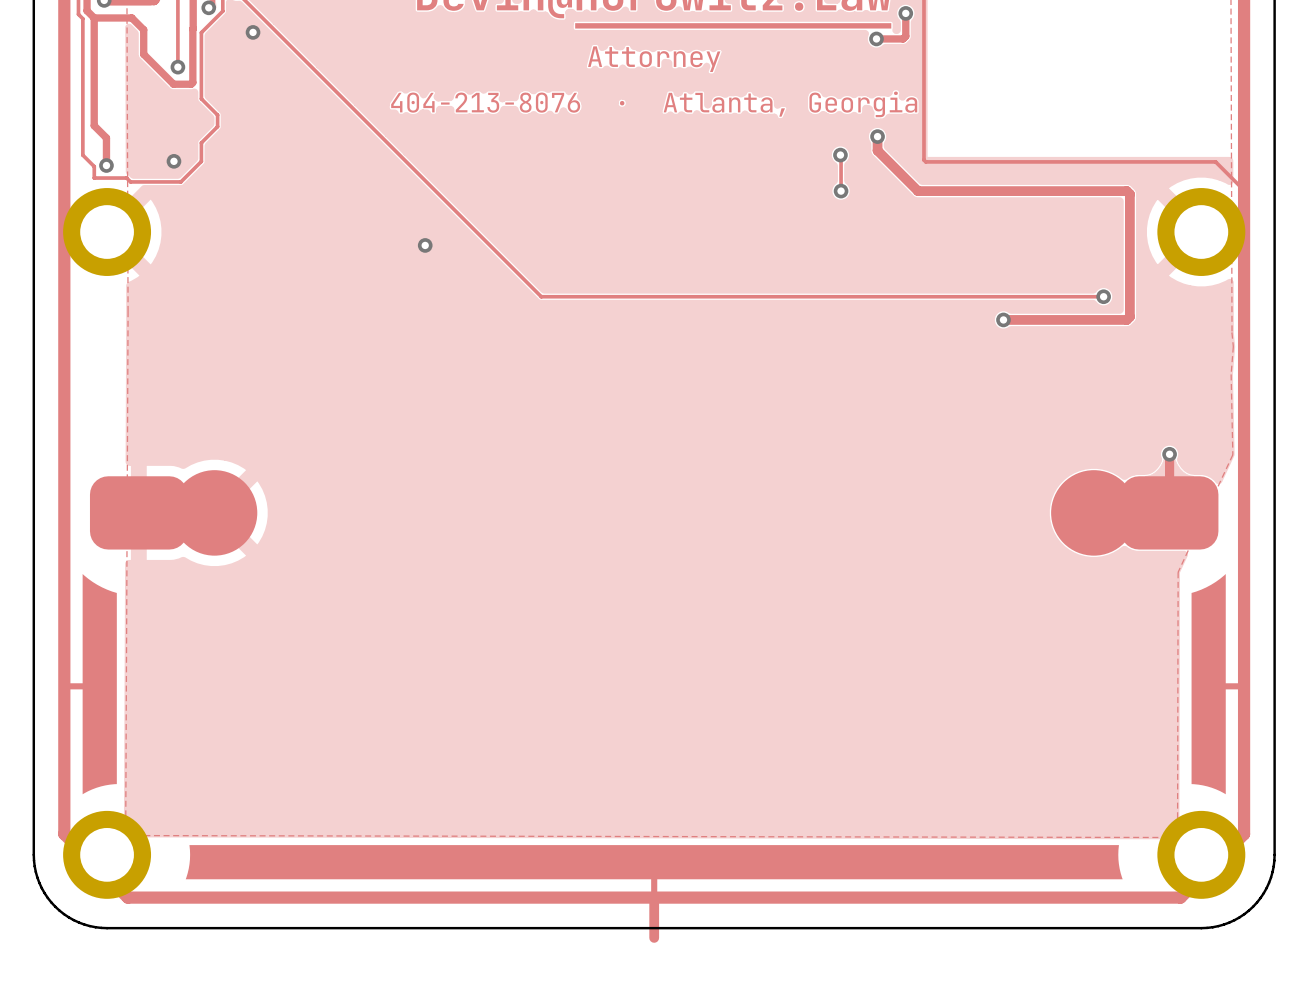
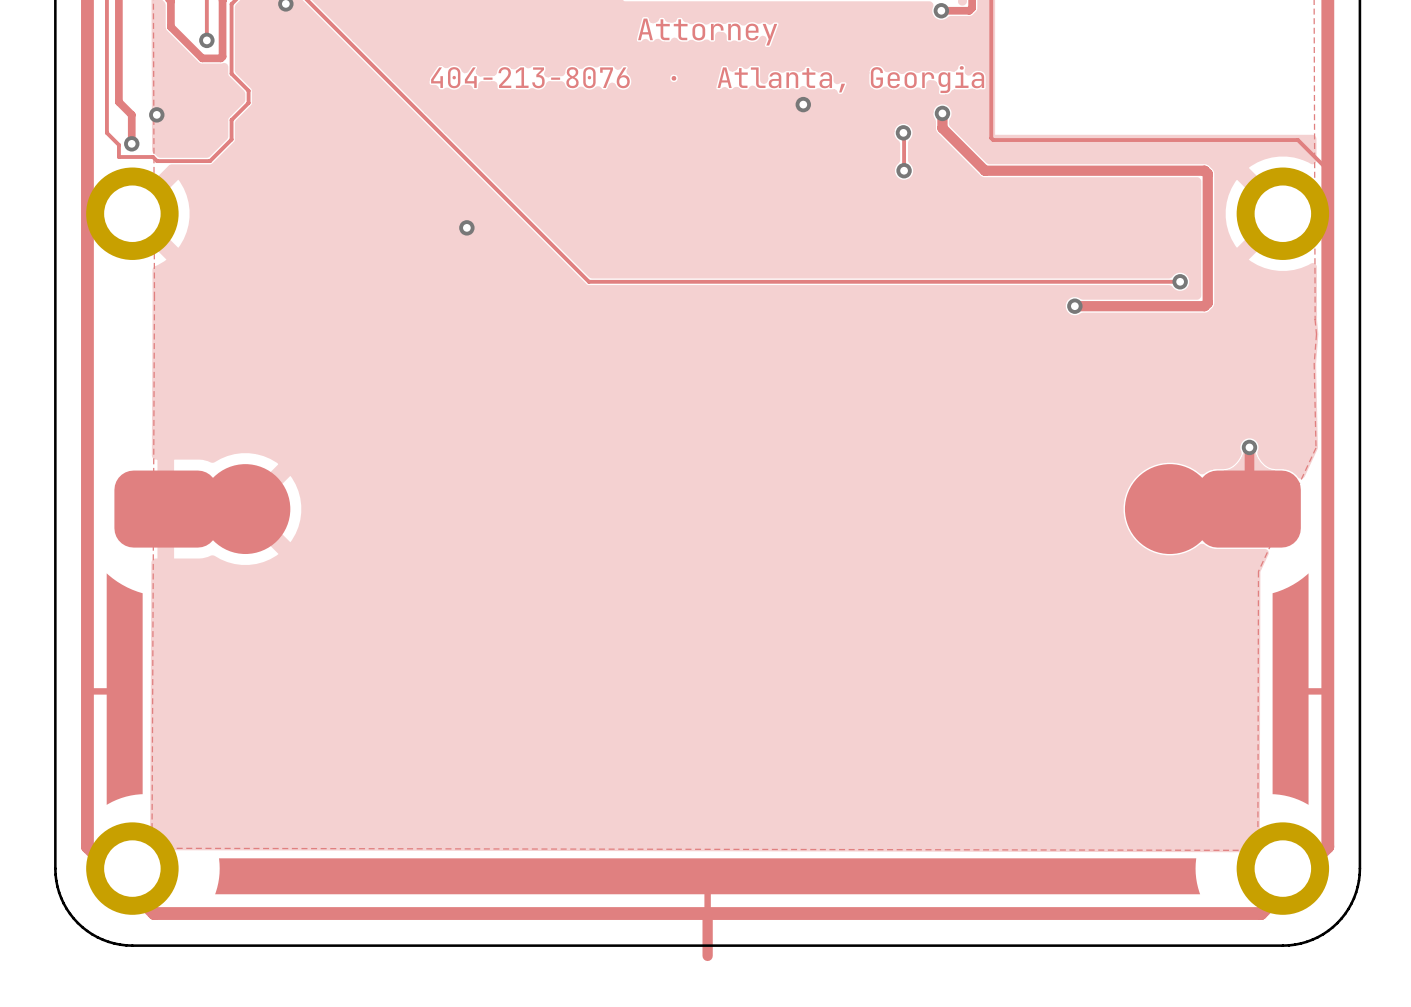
via: none -> (803, 104)
via position: (173, 161) -> (156, 114)

